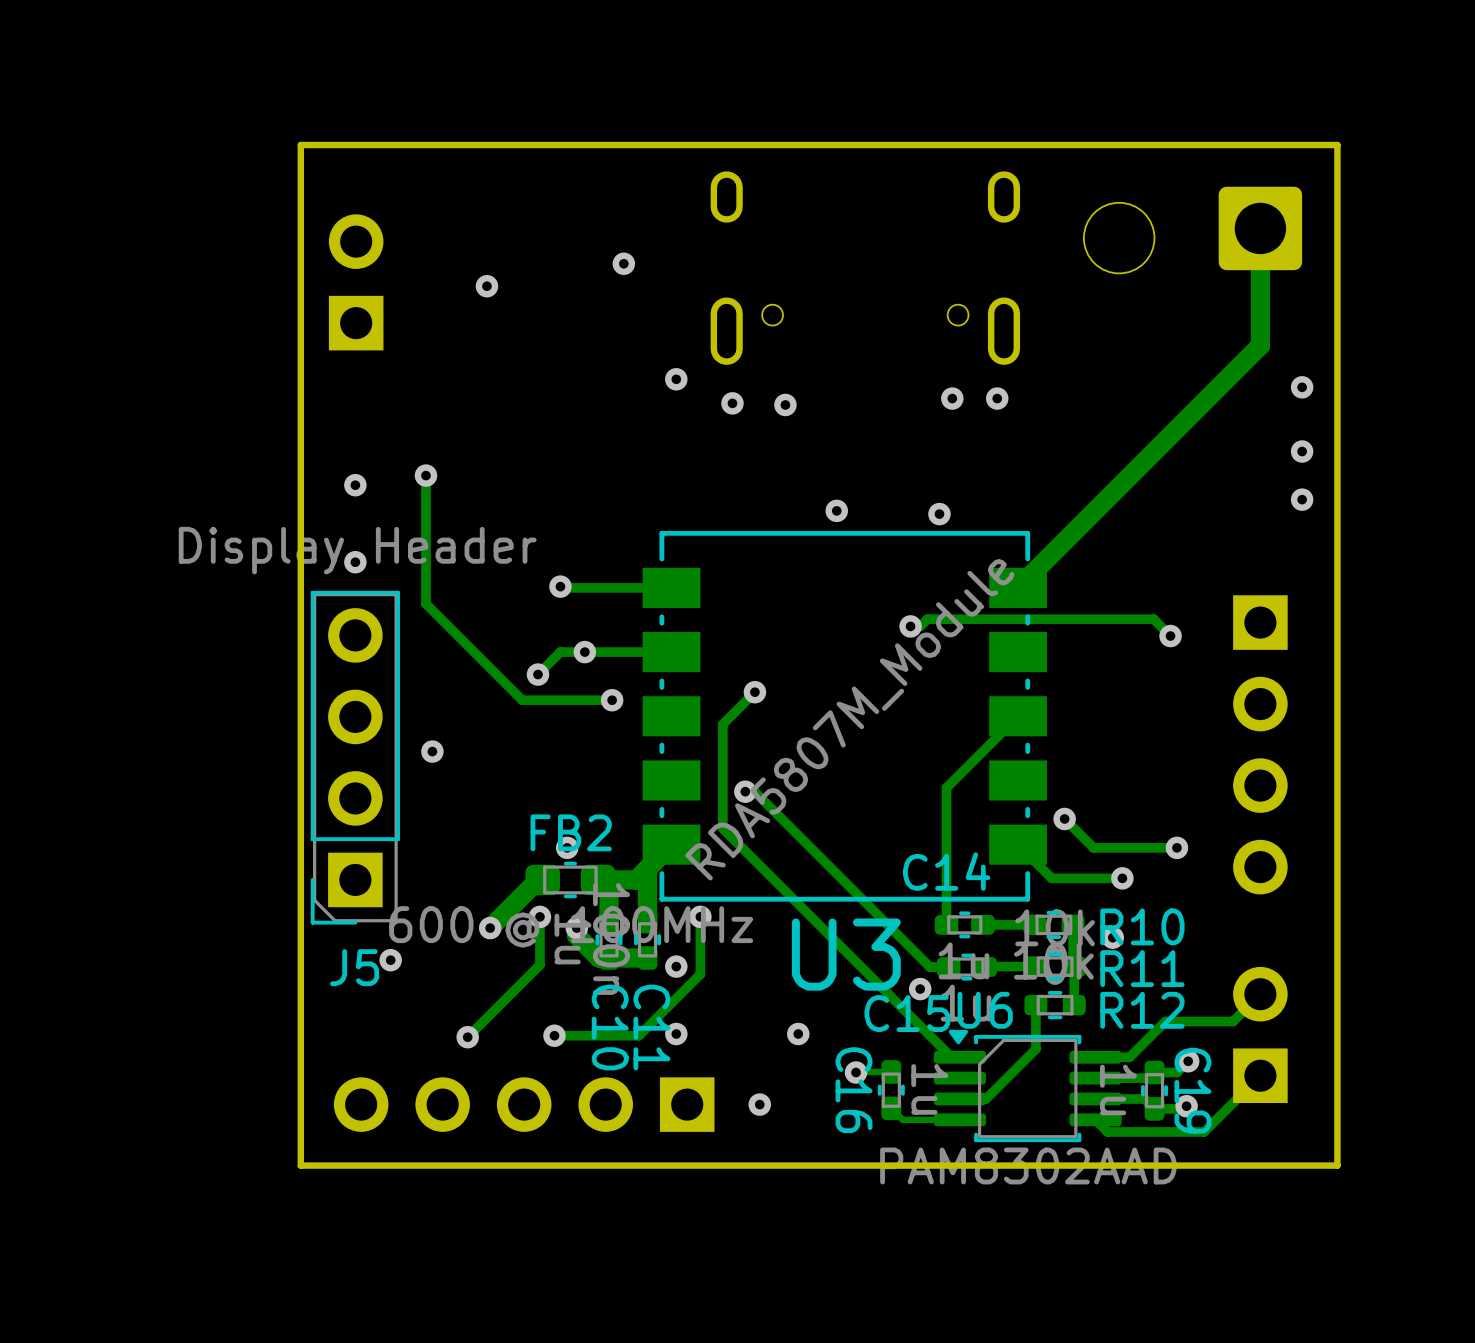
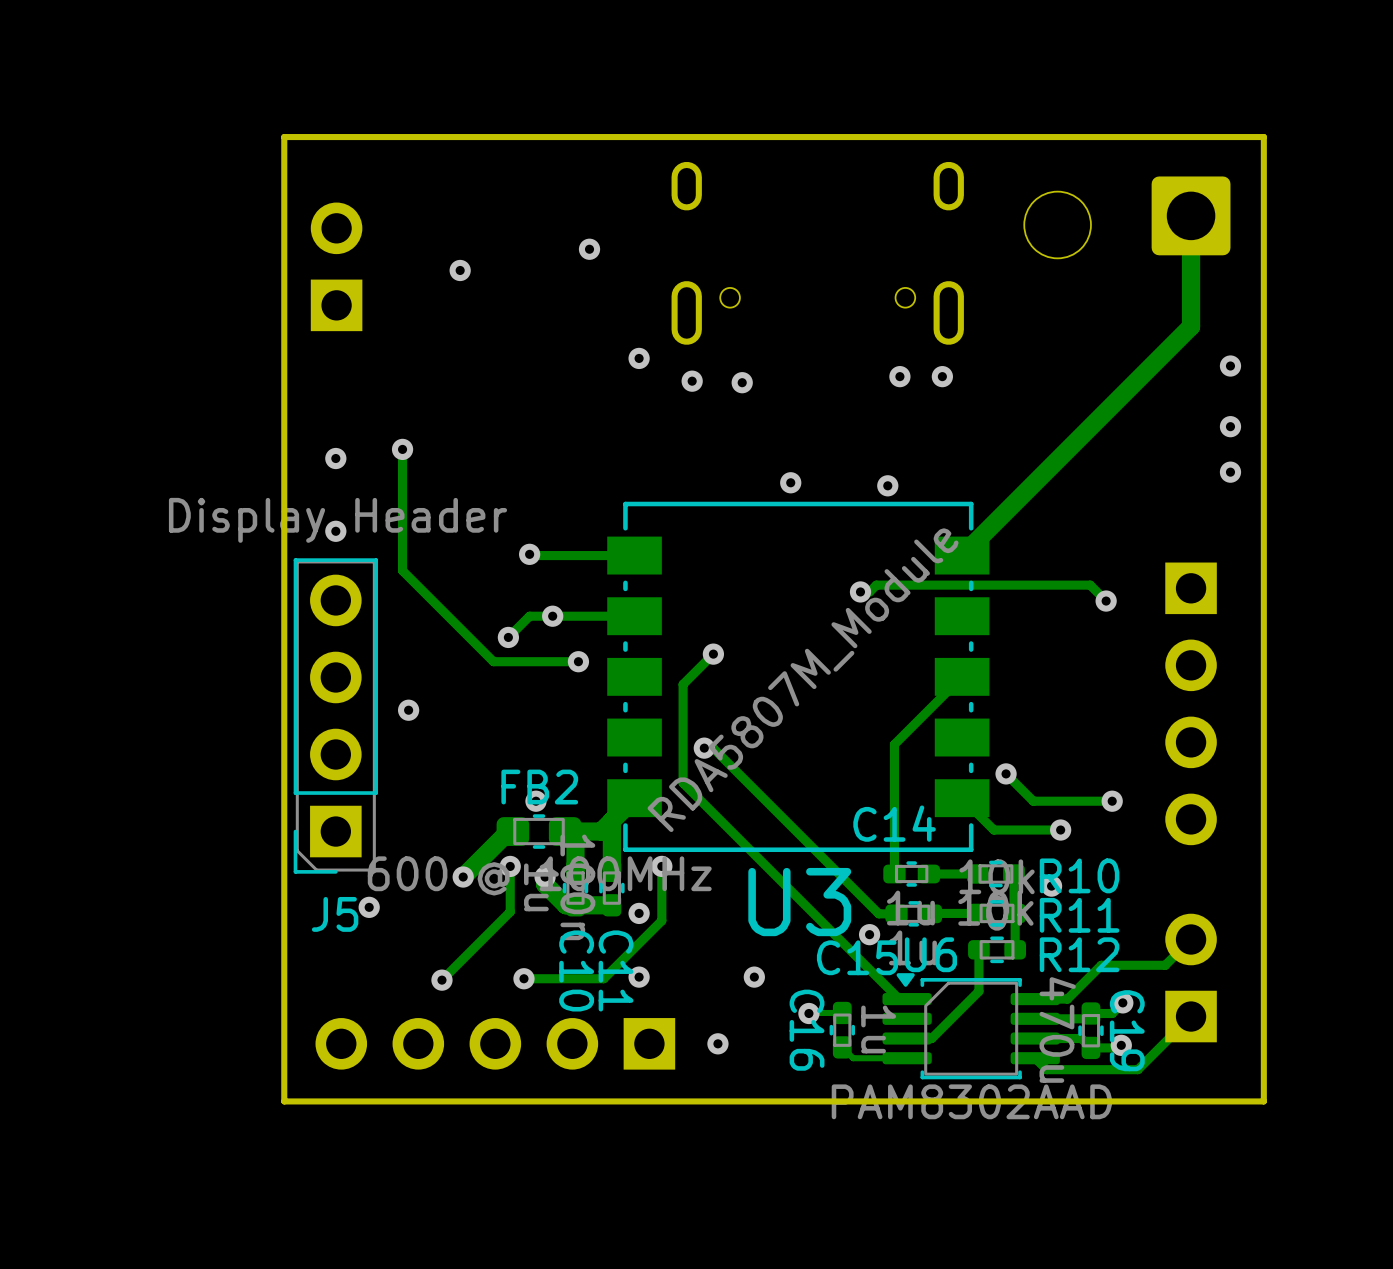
C19 value: 1u (1118, 1089) -> 470u (1057, 1029)

